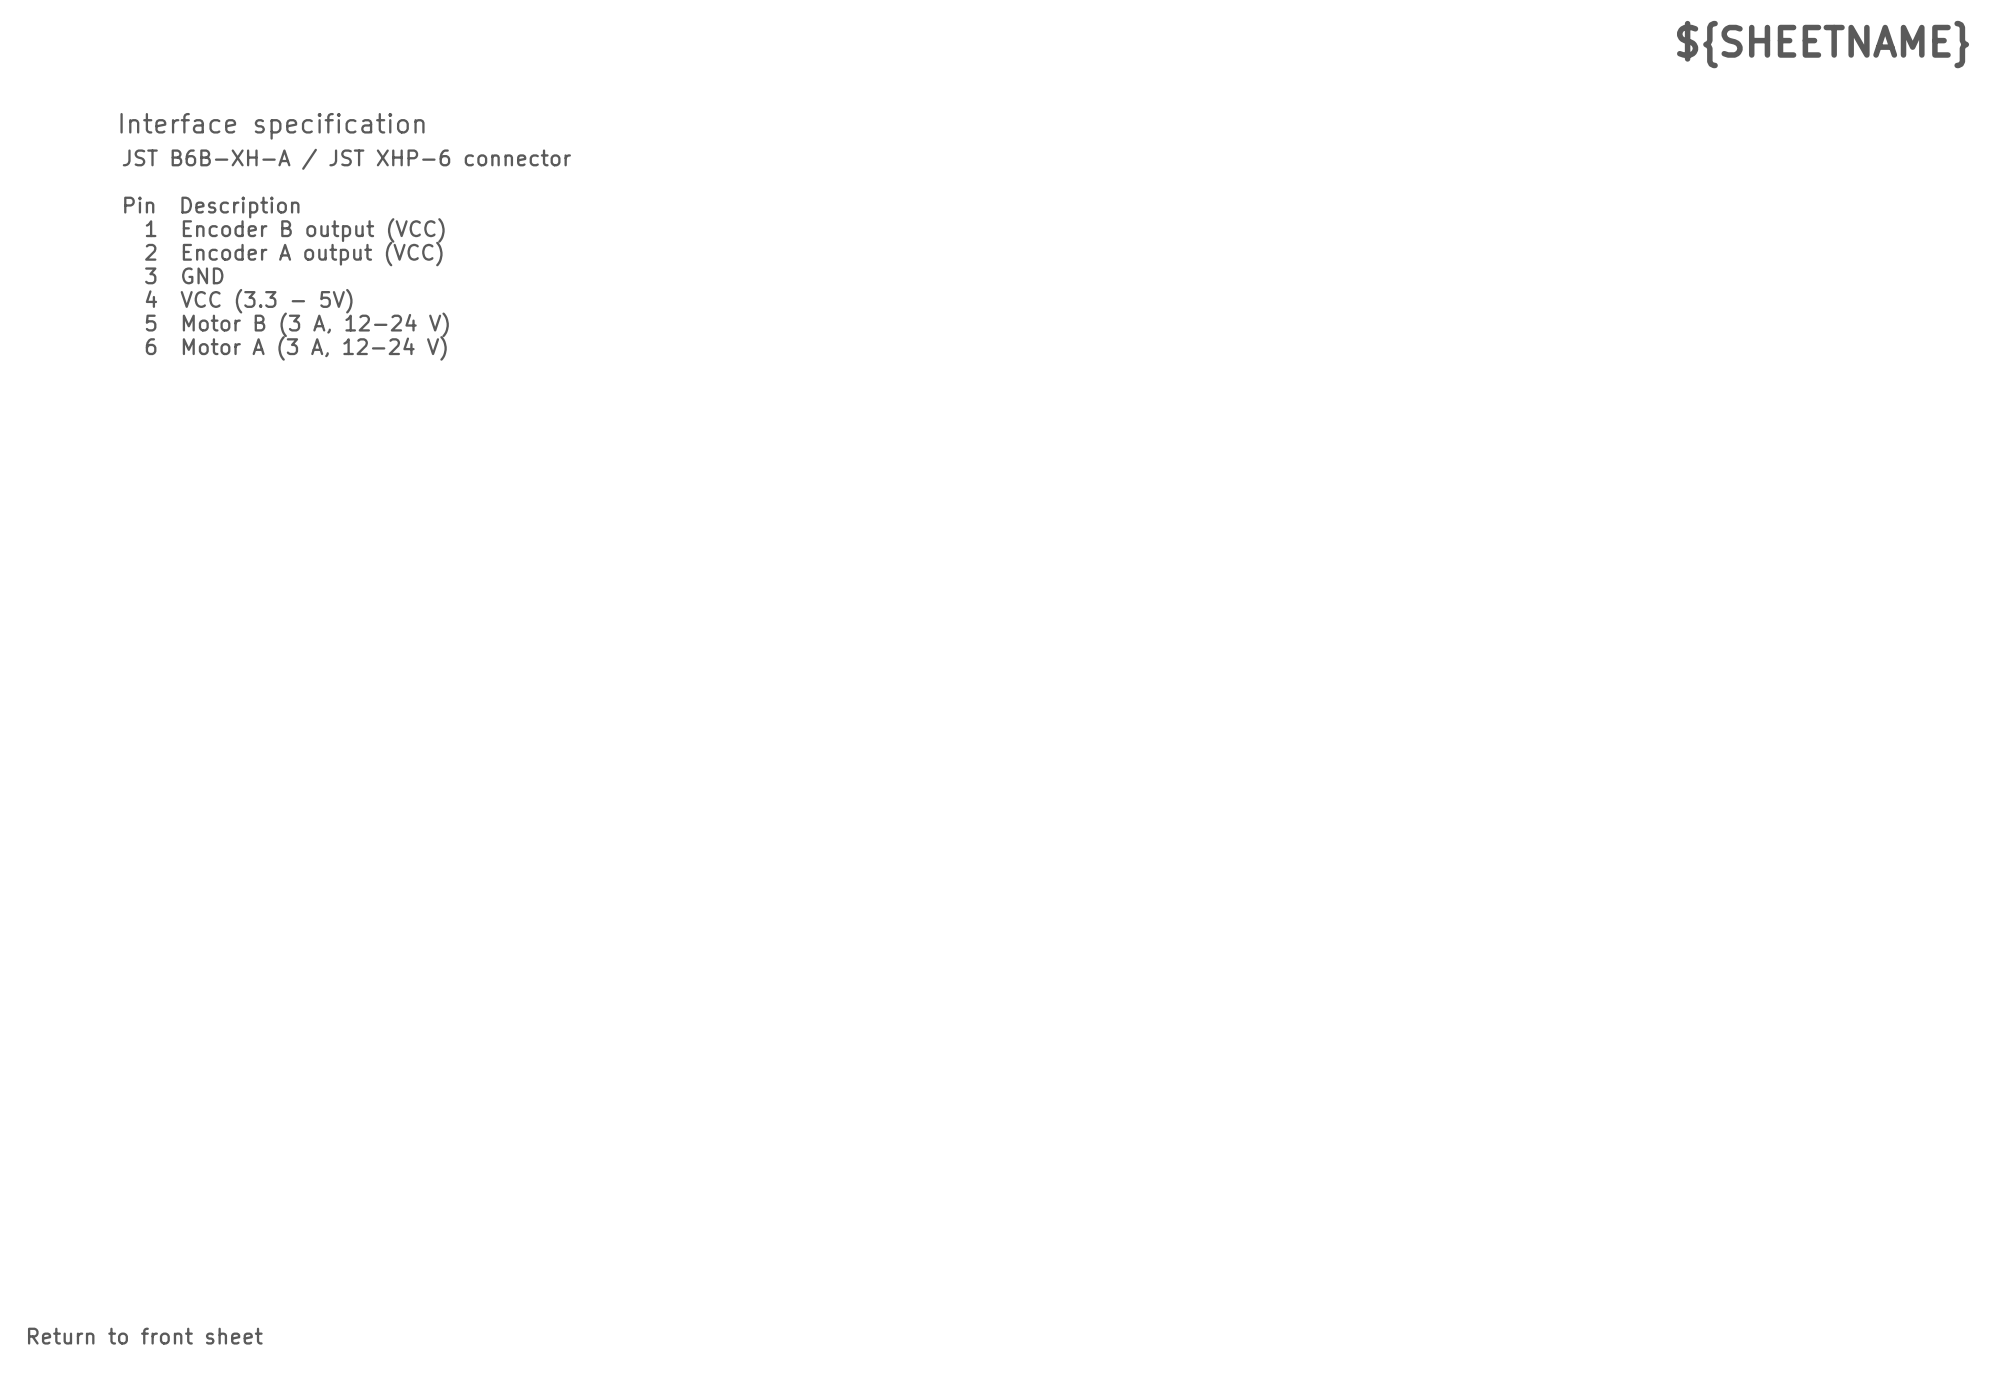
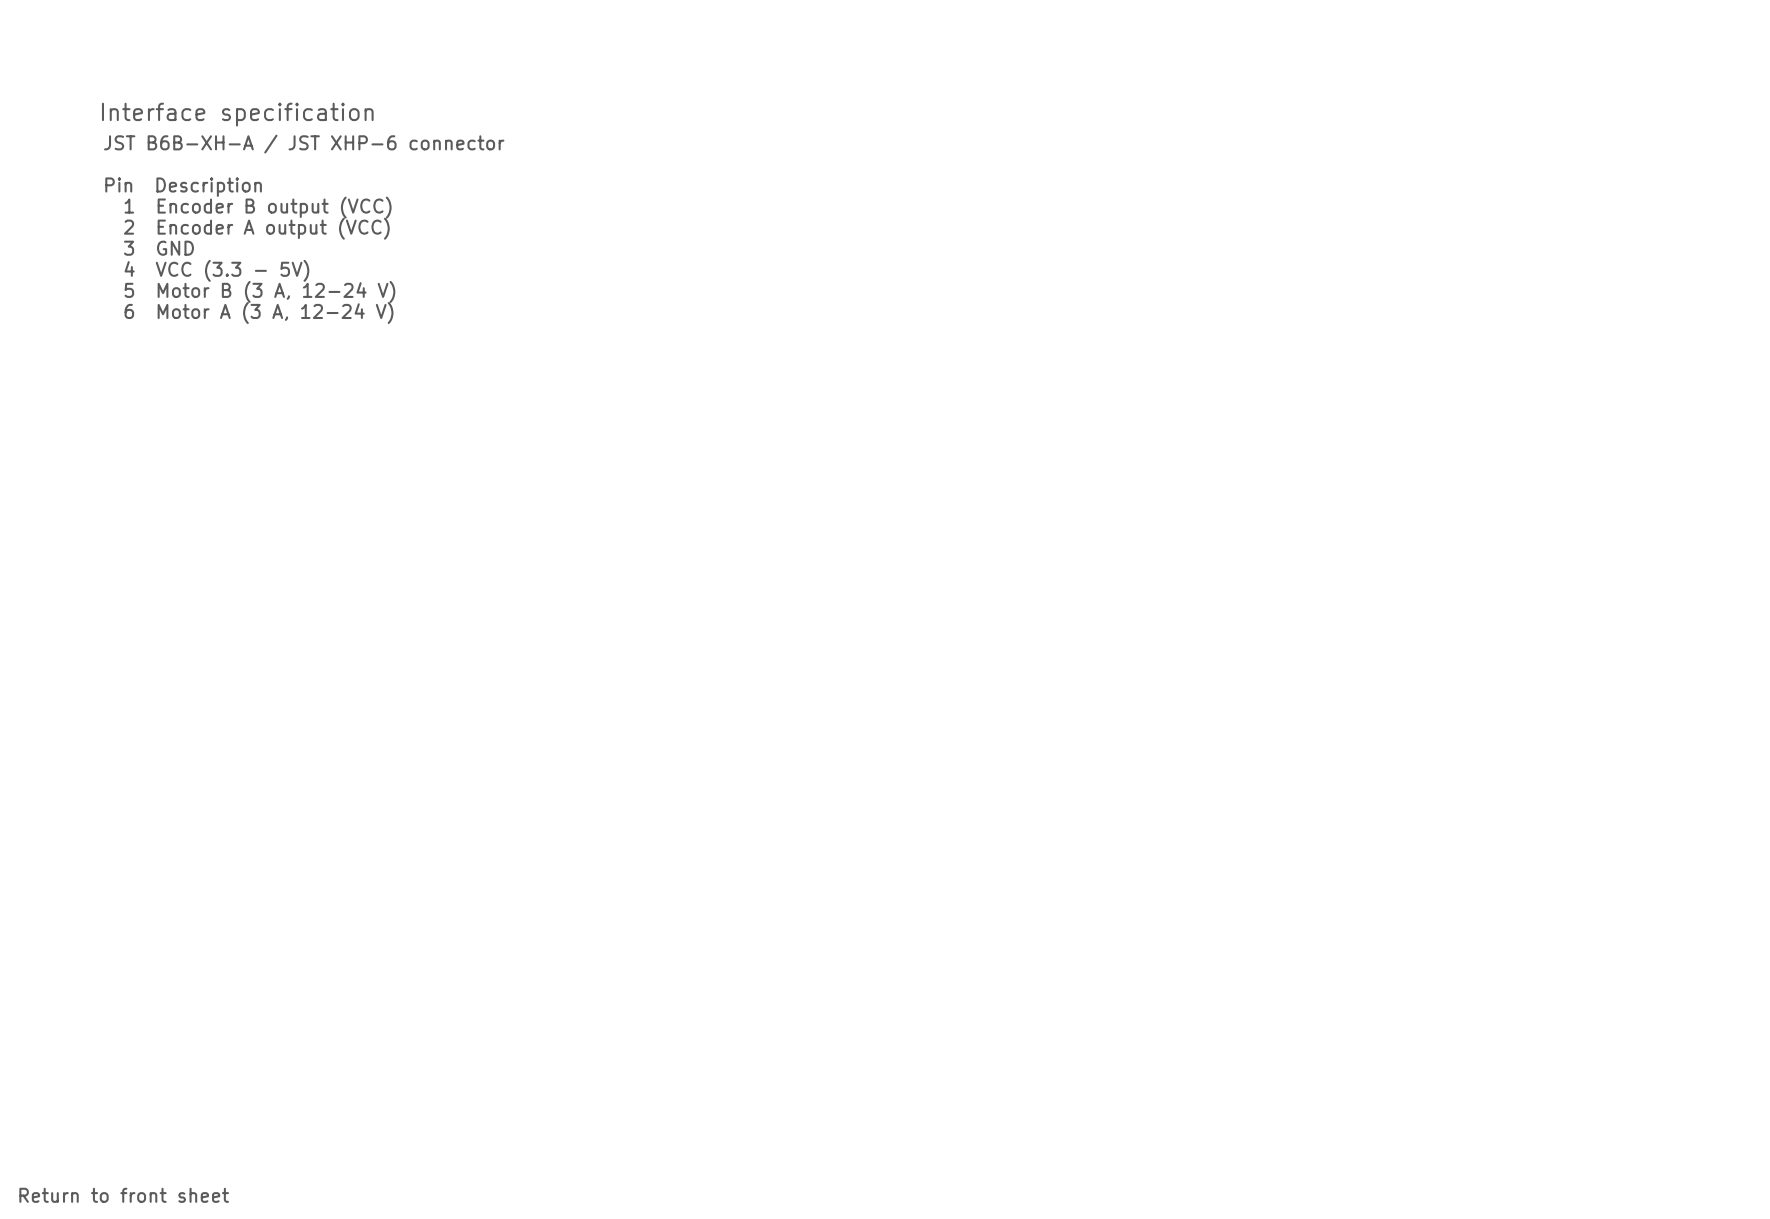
text: ${SHEETNAME} (1823, 44) -> none

